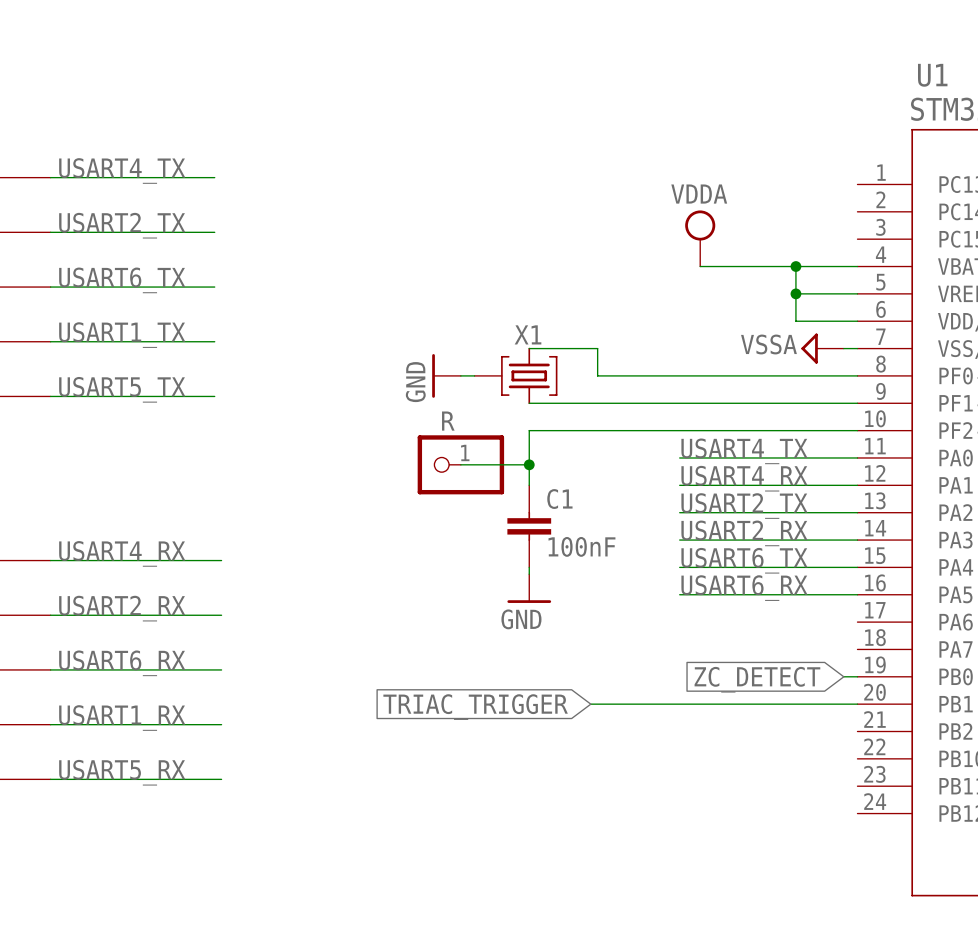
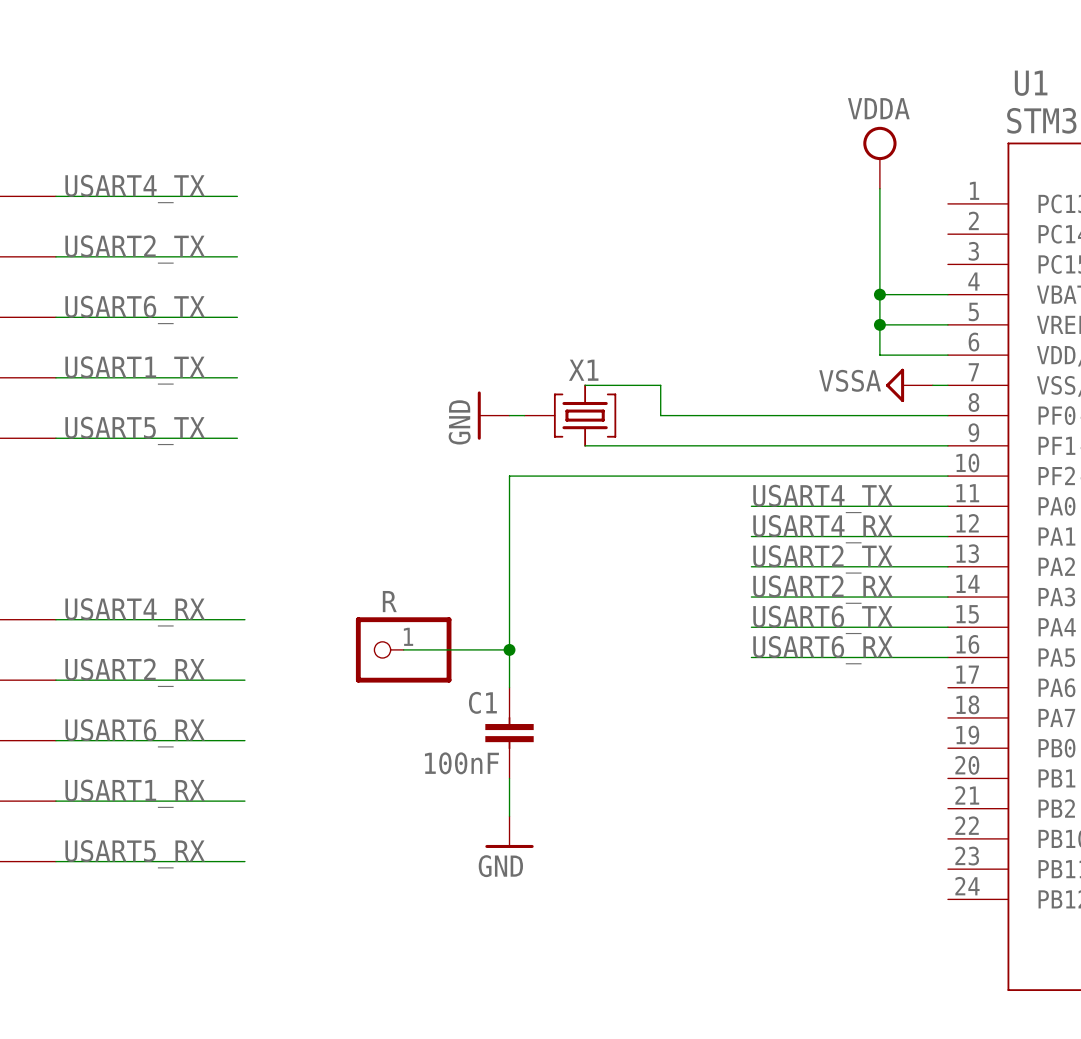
power symbol position: VDDA (700, 238) -> VDDA (879, 157)
wire: (700, 266) (795, 266) -> (879, 188) (879, 294)
wire: (529, 430) (529, 485) -> (585, 476) (509, 476) (509, 687)
wire: (460, 464) (529, 464) -> none
R position: (460, 464) -> (403, 649)
junction: (529, 464) -> none
C1 name position: C1 (559, 499) -> C1 (482, 702)
C1 position: (529, 526) -> (509, 733)
C1 value position: 100nF (581, 546) -> 100nF (461, 763)
wire: (529, 567) (529, 574) -> none
wire: none -> (403, 649) (509, 649)
junction: none -> (509, 649)
power symbol position: GND (529, 588) -> GND (509, 832)
wire: (843, 676) (857, 676) -> none
global label: ZC_DETECT (757, 679) -> none
wire: none -> (509, 778) (509, 816)
wire: (590, 704) (857, 704) -> none
global label: TRIAC_TRIGGER (475, 707) -> none

